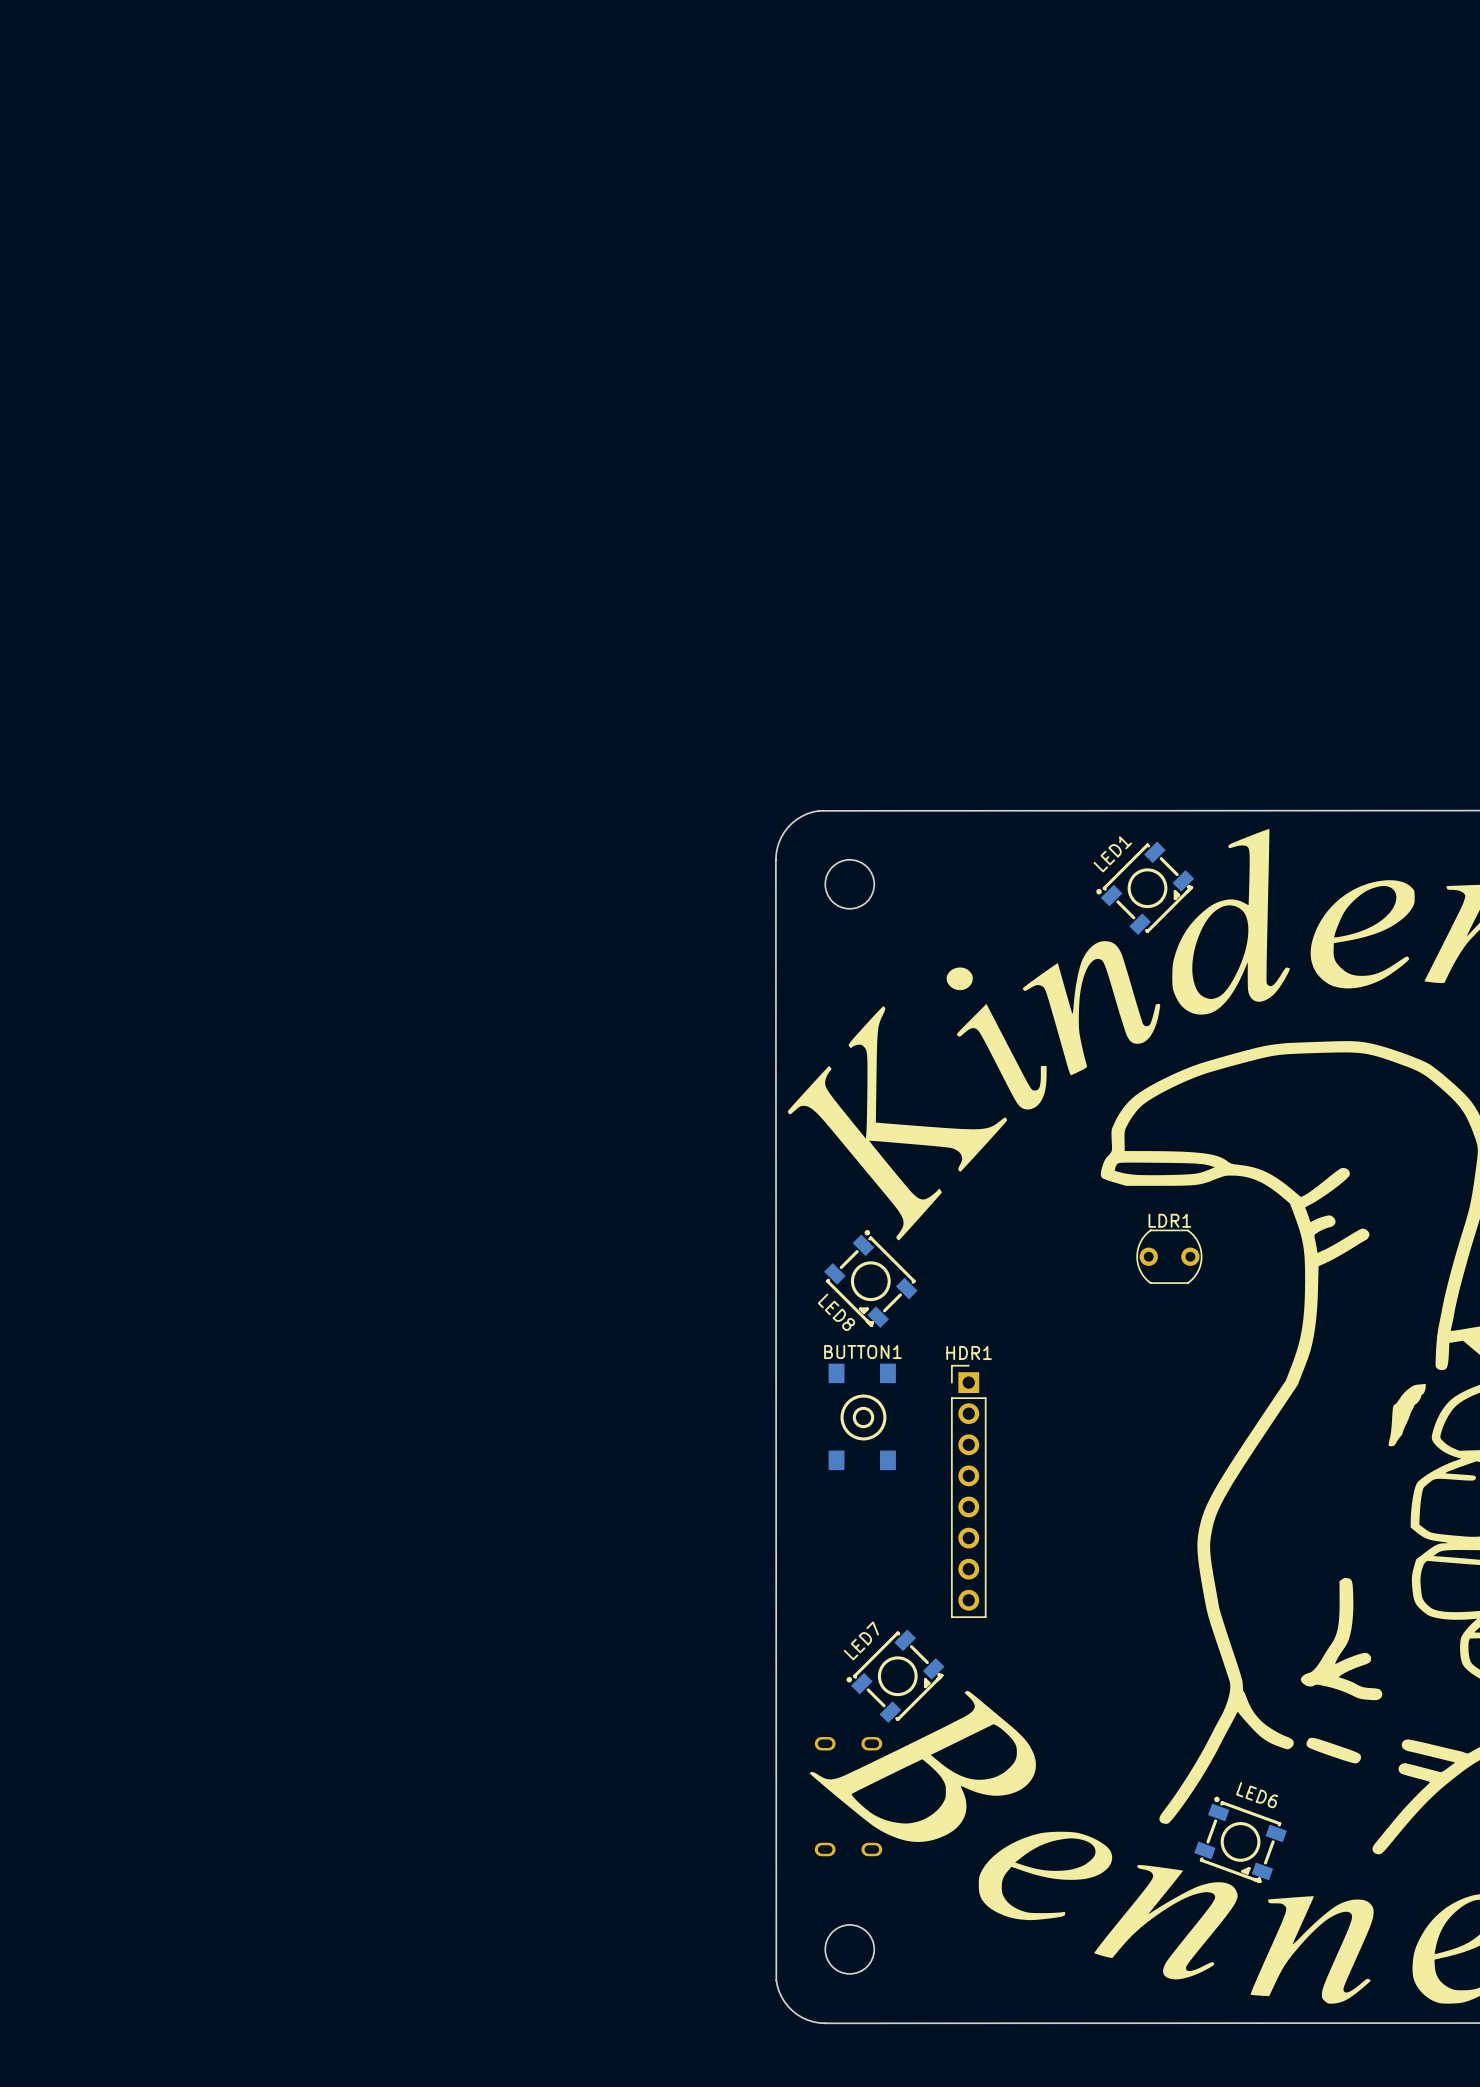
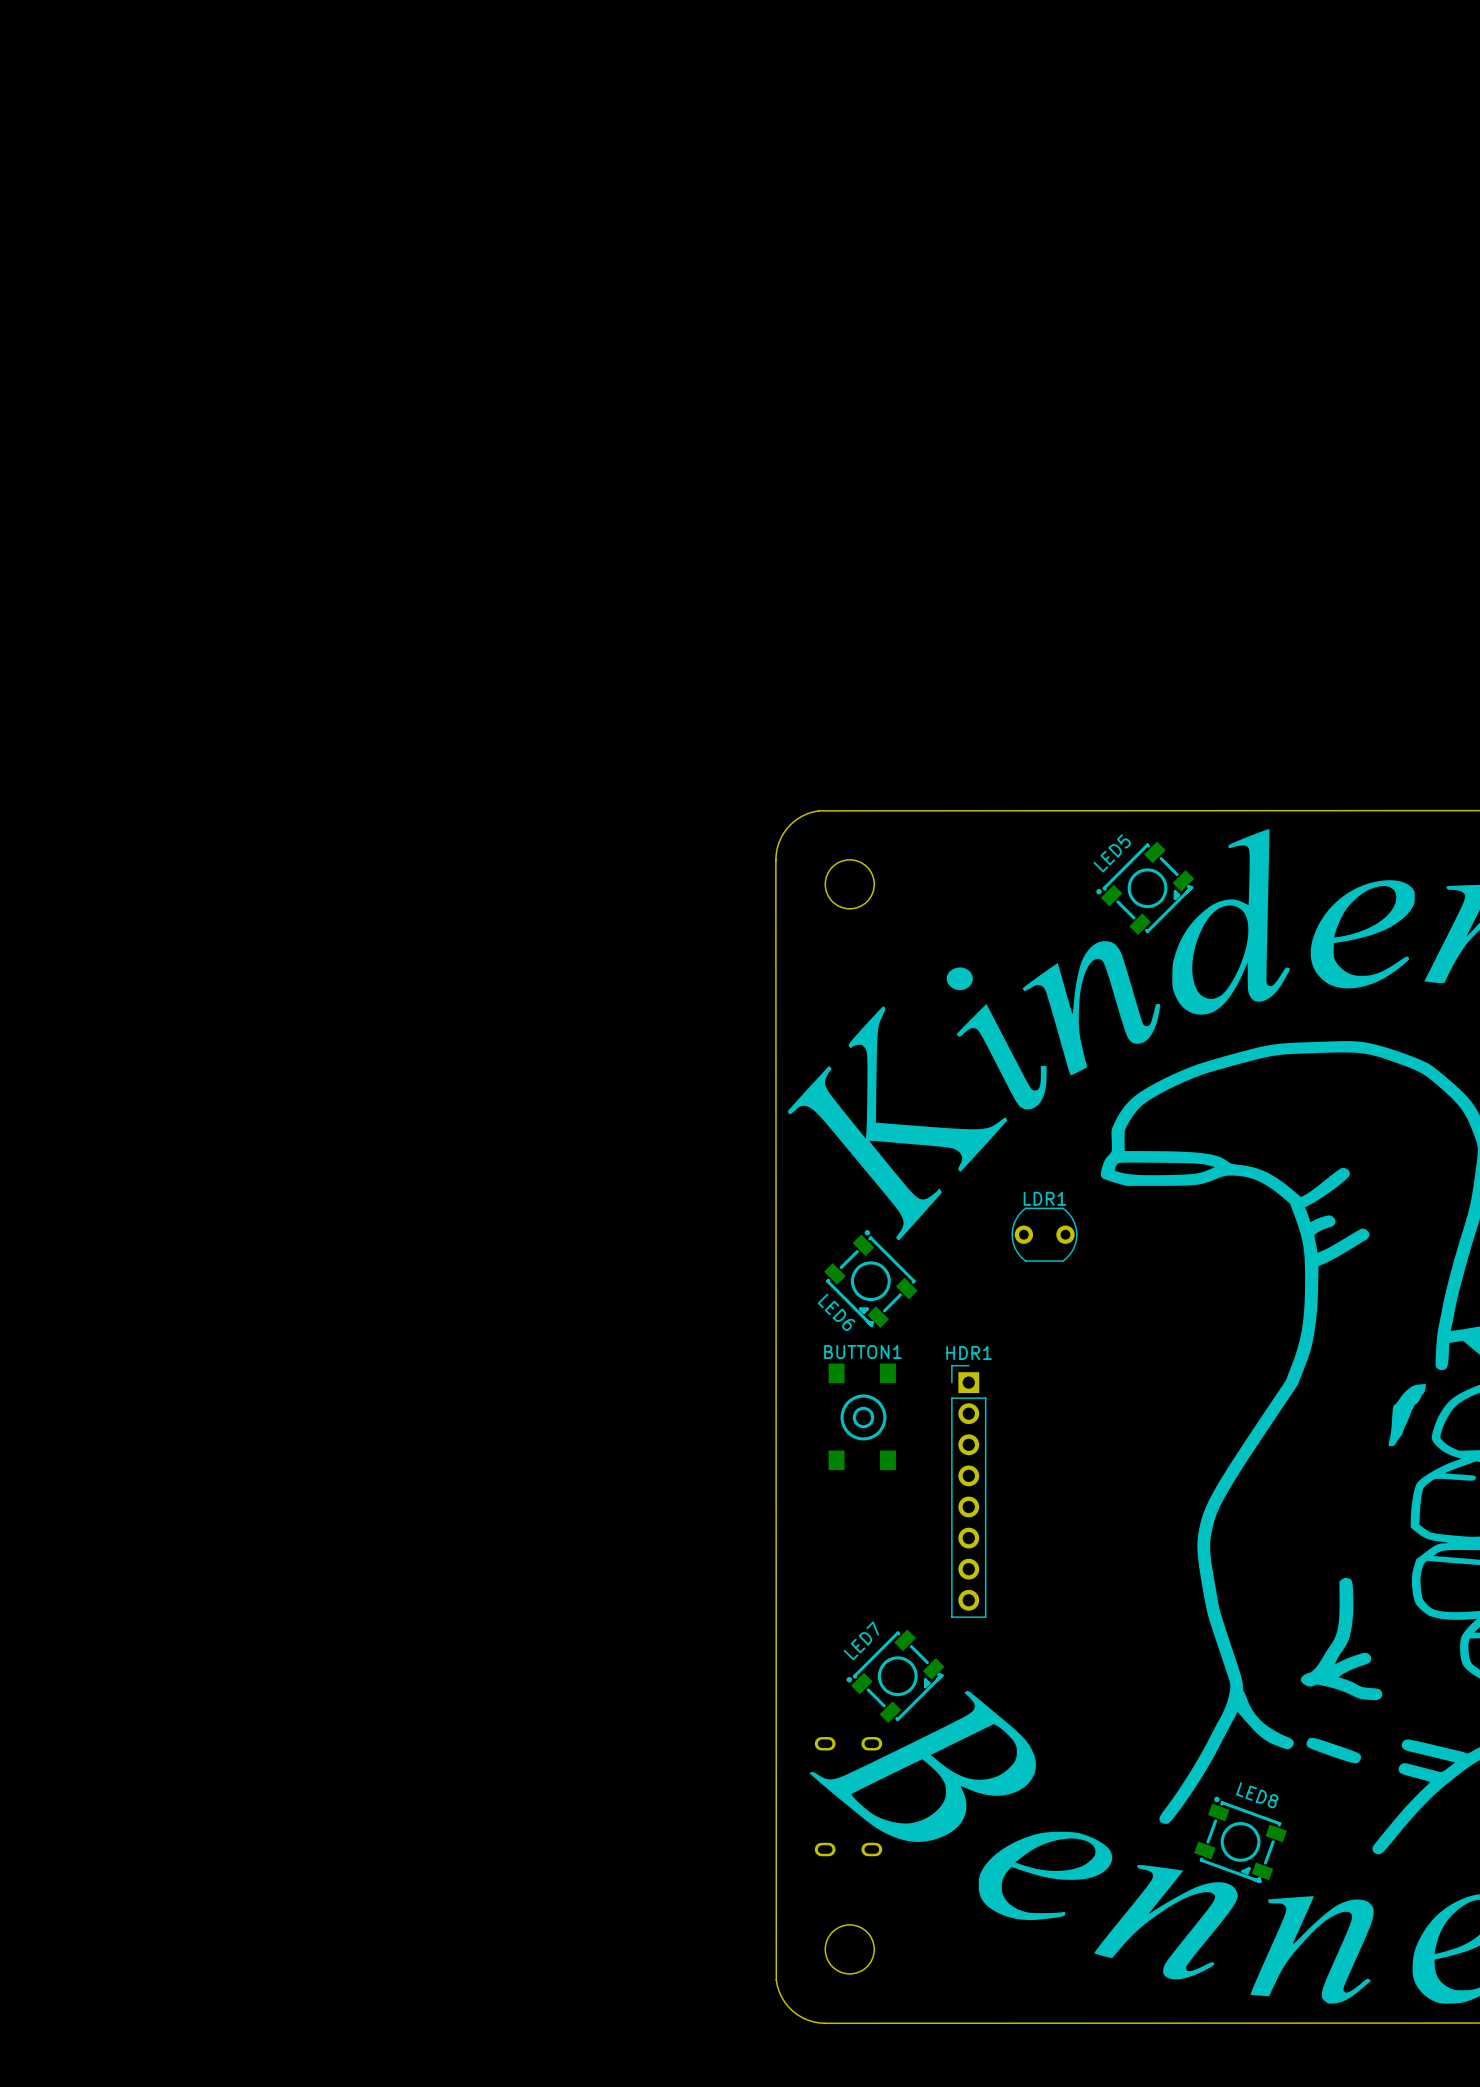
LED1 name: LED1 (1112, 854) -> LED5 (1112, 853)
LDR1 position: (1169, 1256) -> (1044, 1234)
LED8 name: LED8 (836, 1312) -> LED6 (836, 1312)
LED6 name: LED6 (1257, 1795) -> LED8 (1257, 1795)

